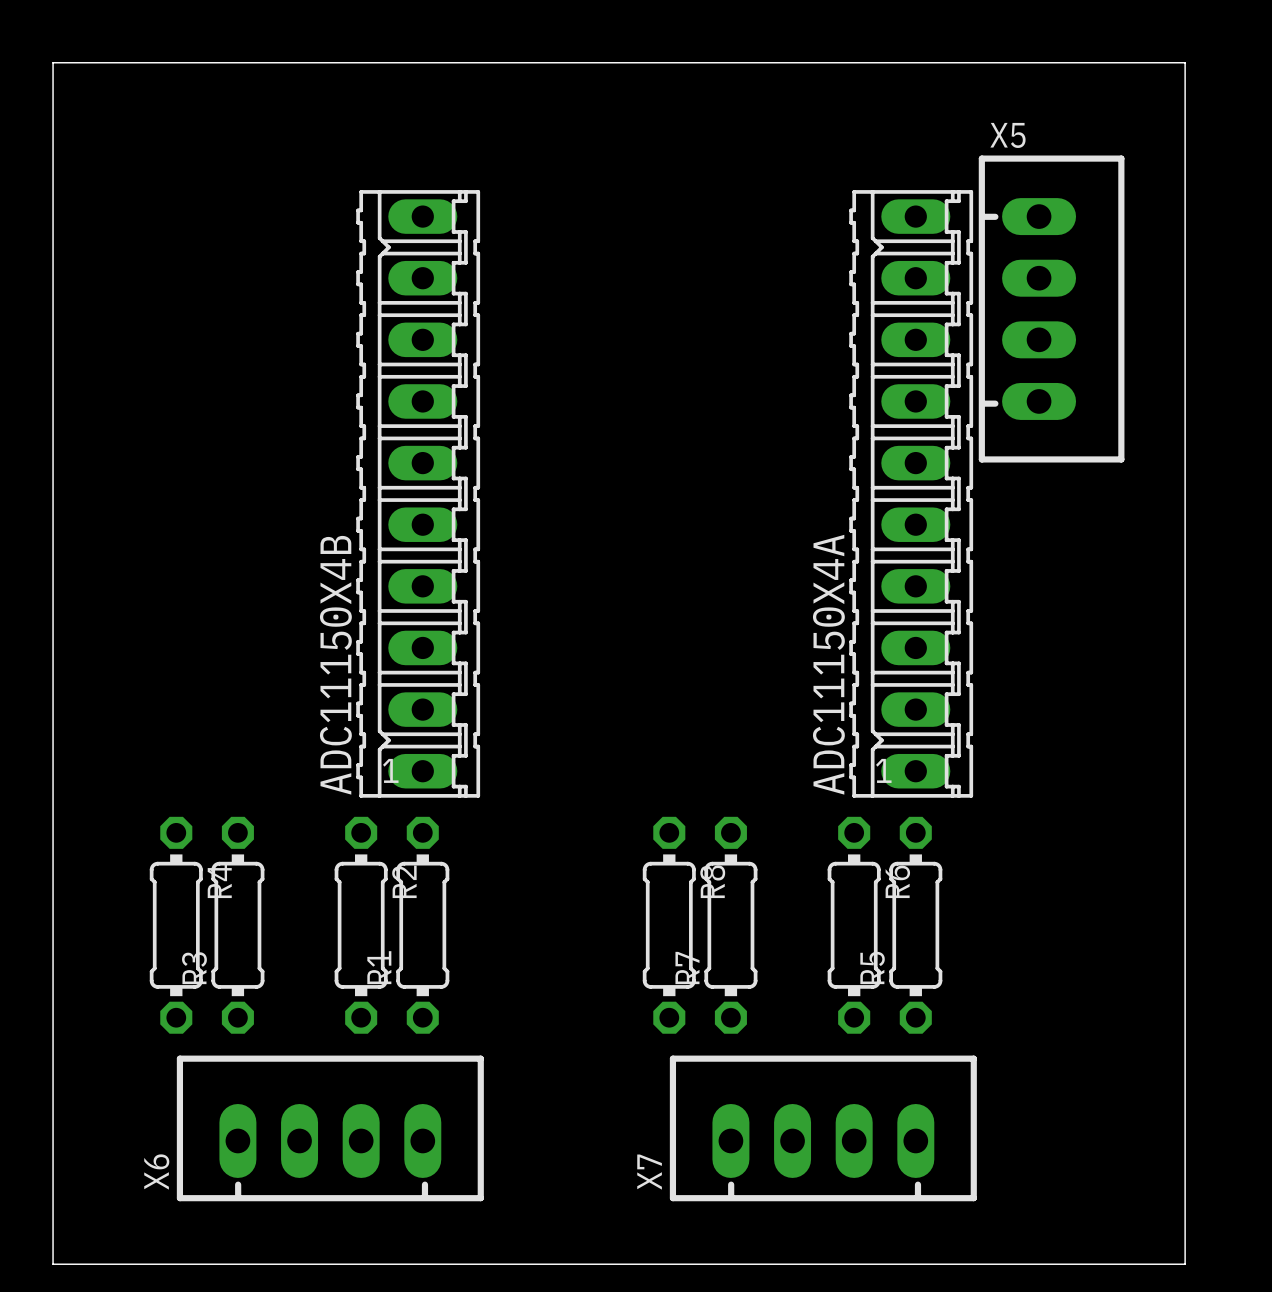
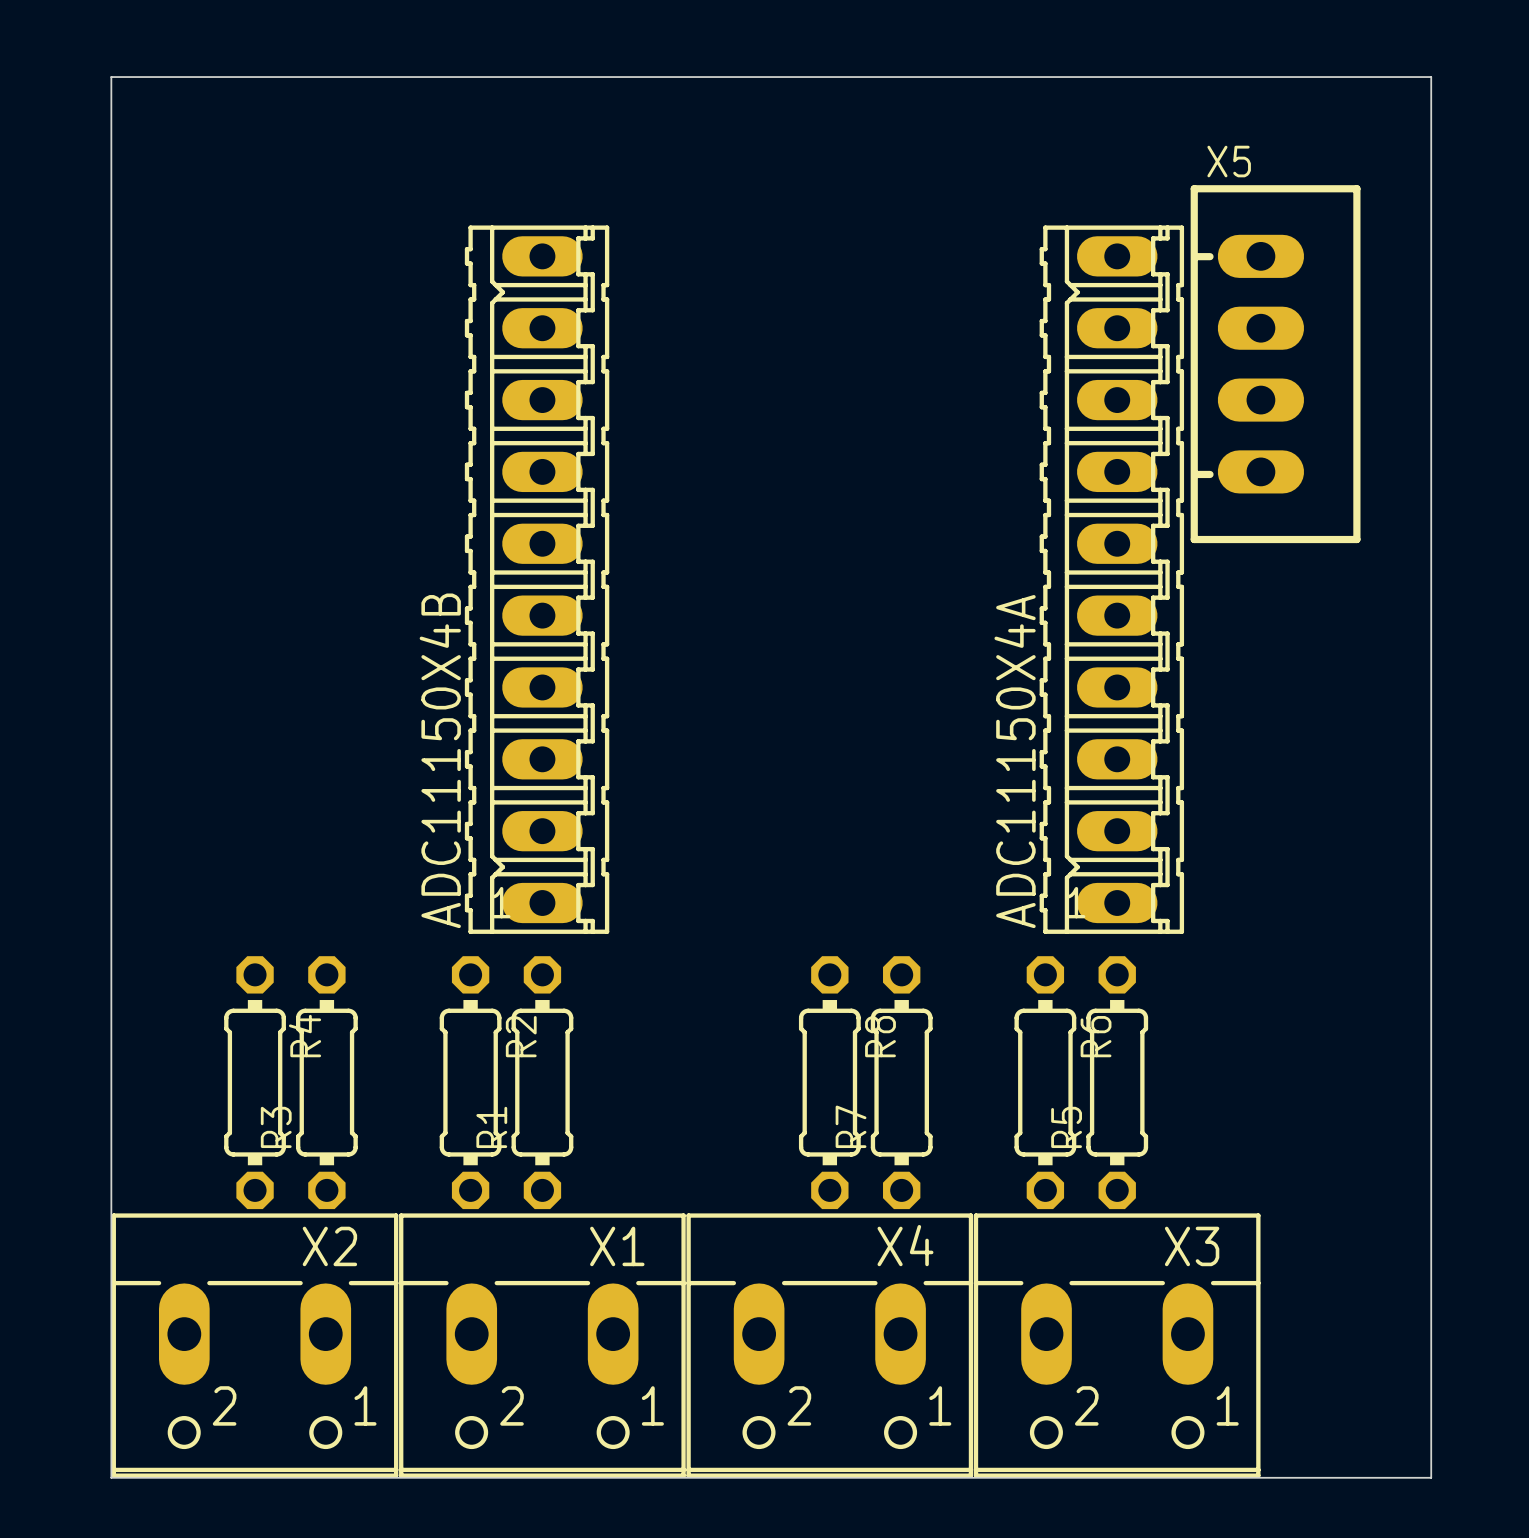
X6: (330, 1128) -> none
X7: (823, 1128) -> none
X2: none -> (254, 1345)
X1: none -> (542, 1345)
X4: none -> (829, 1345)
X3: none -> (1117, 1345)

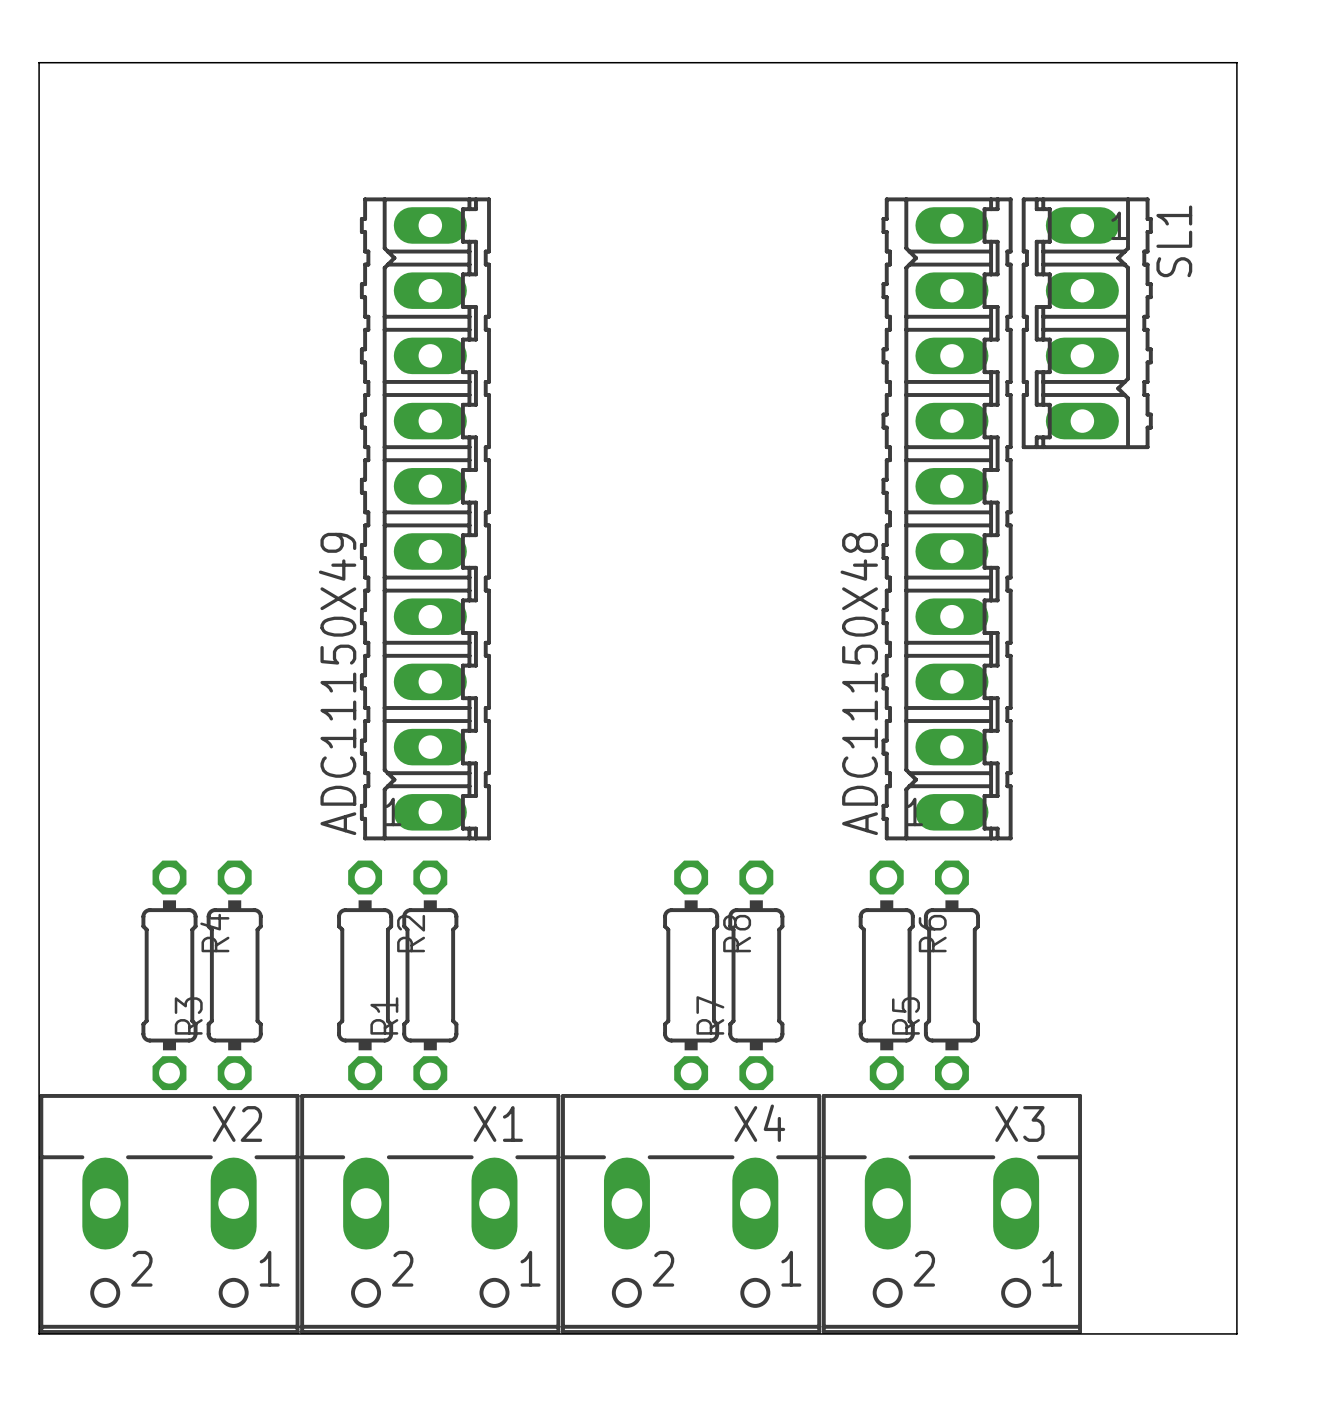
SL1: none -> (1087, 323)
X5: (1275, 364) -> none
ADC11150X4B name: ADC11150X4B (440, 760) -> ADC11150X49 (337, 683)
ADC11150X4A name: ADC11150X4A (1015, 761) -> ADC11150X48 (859, 683)

